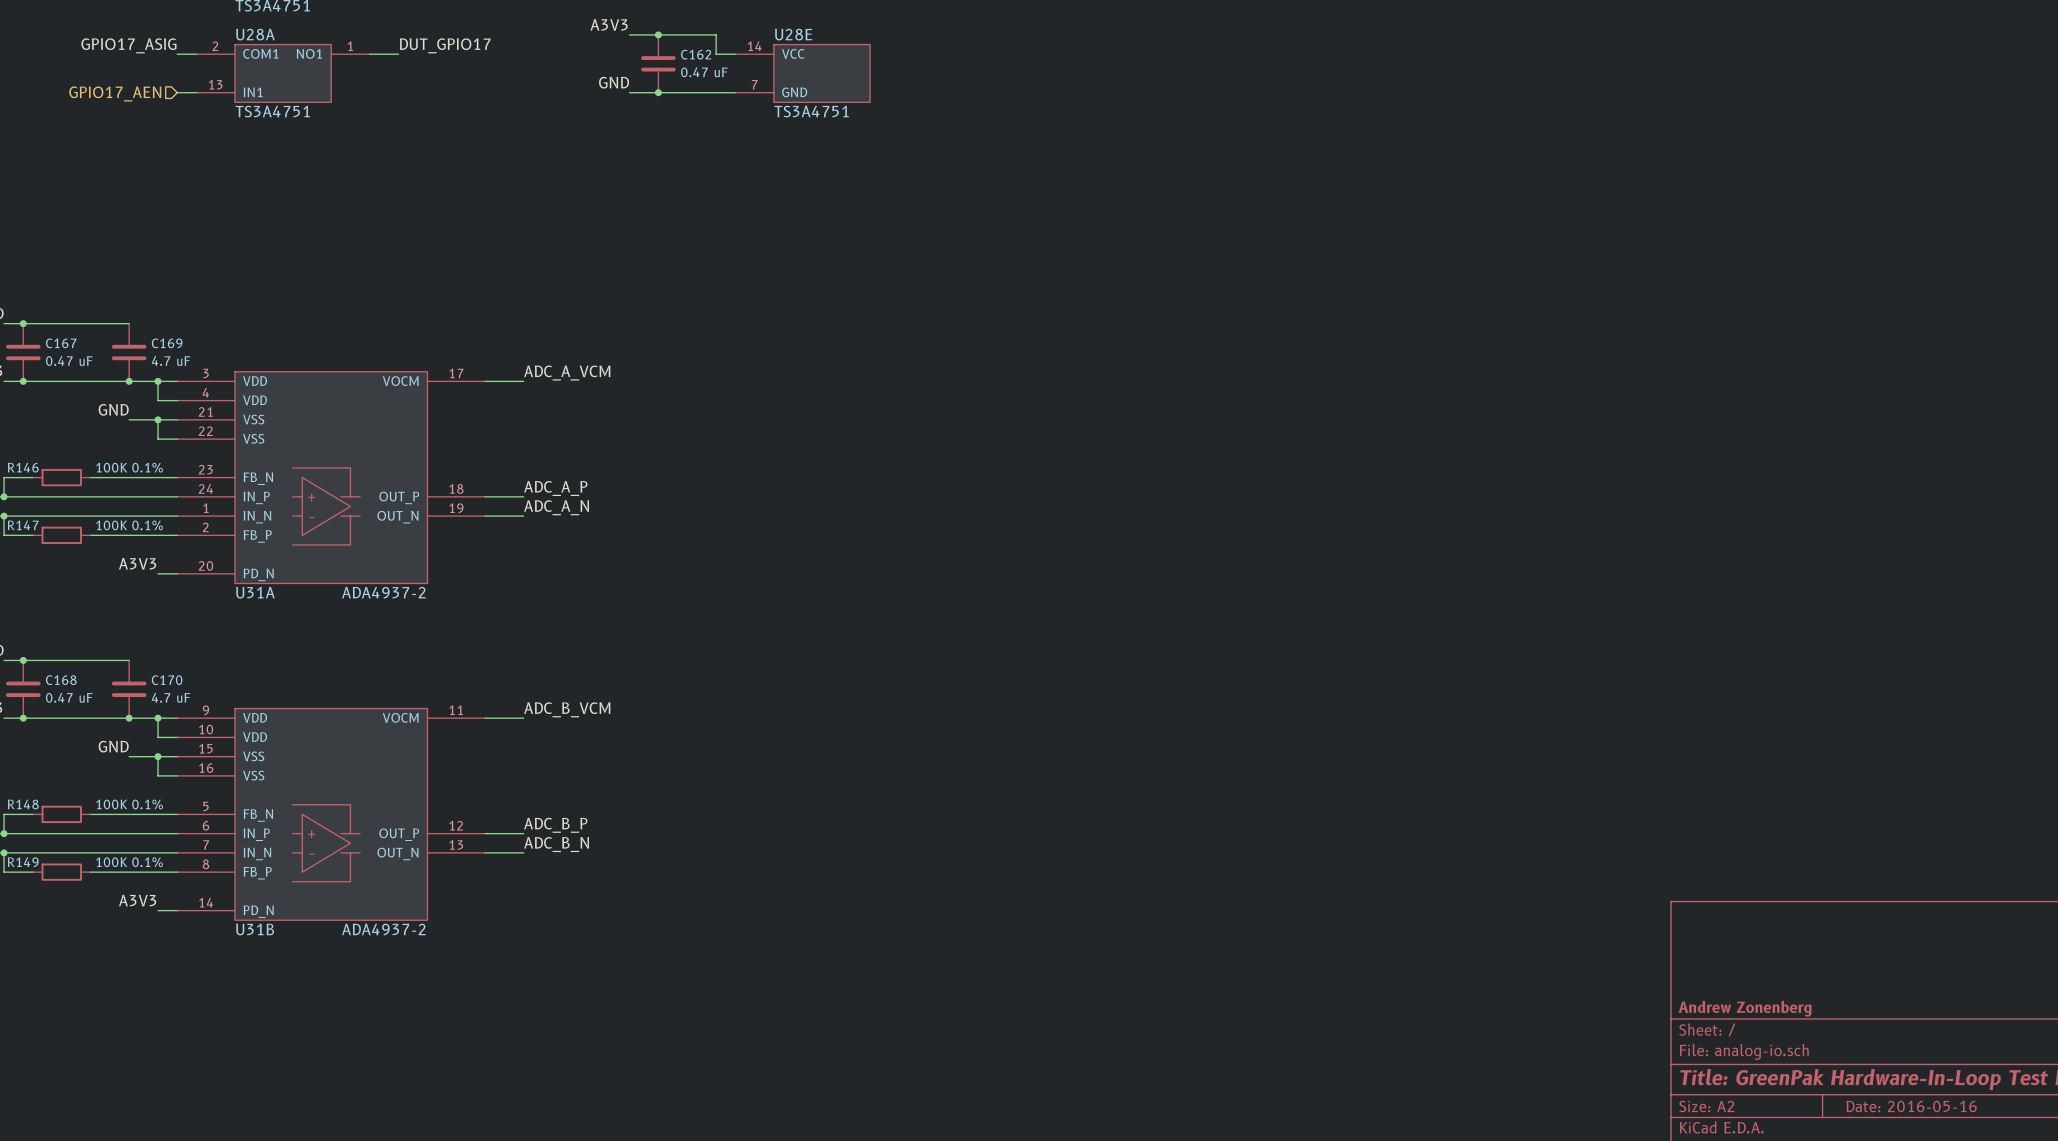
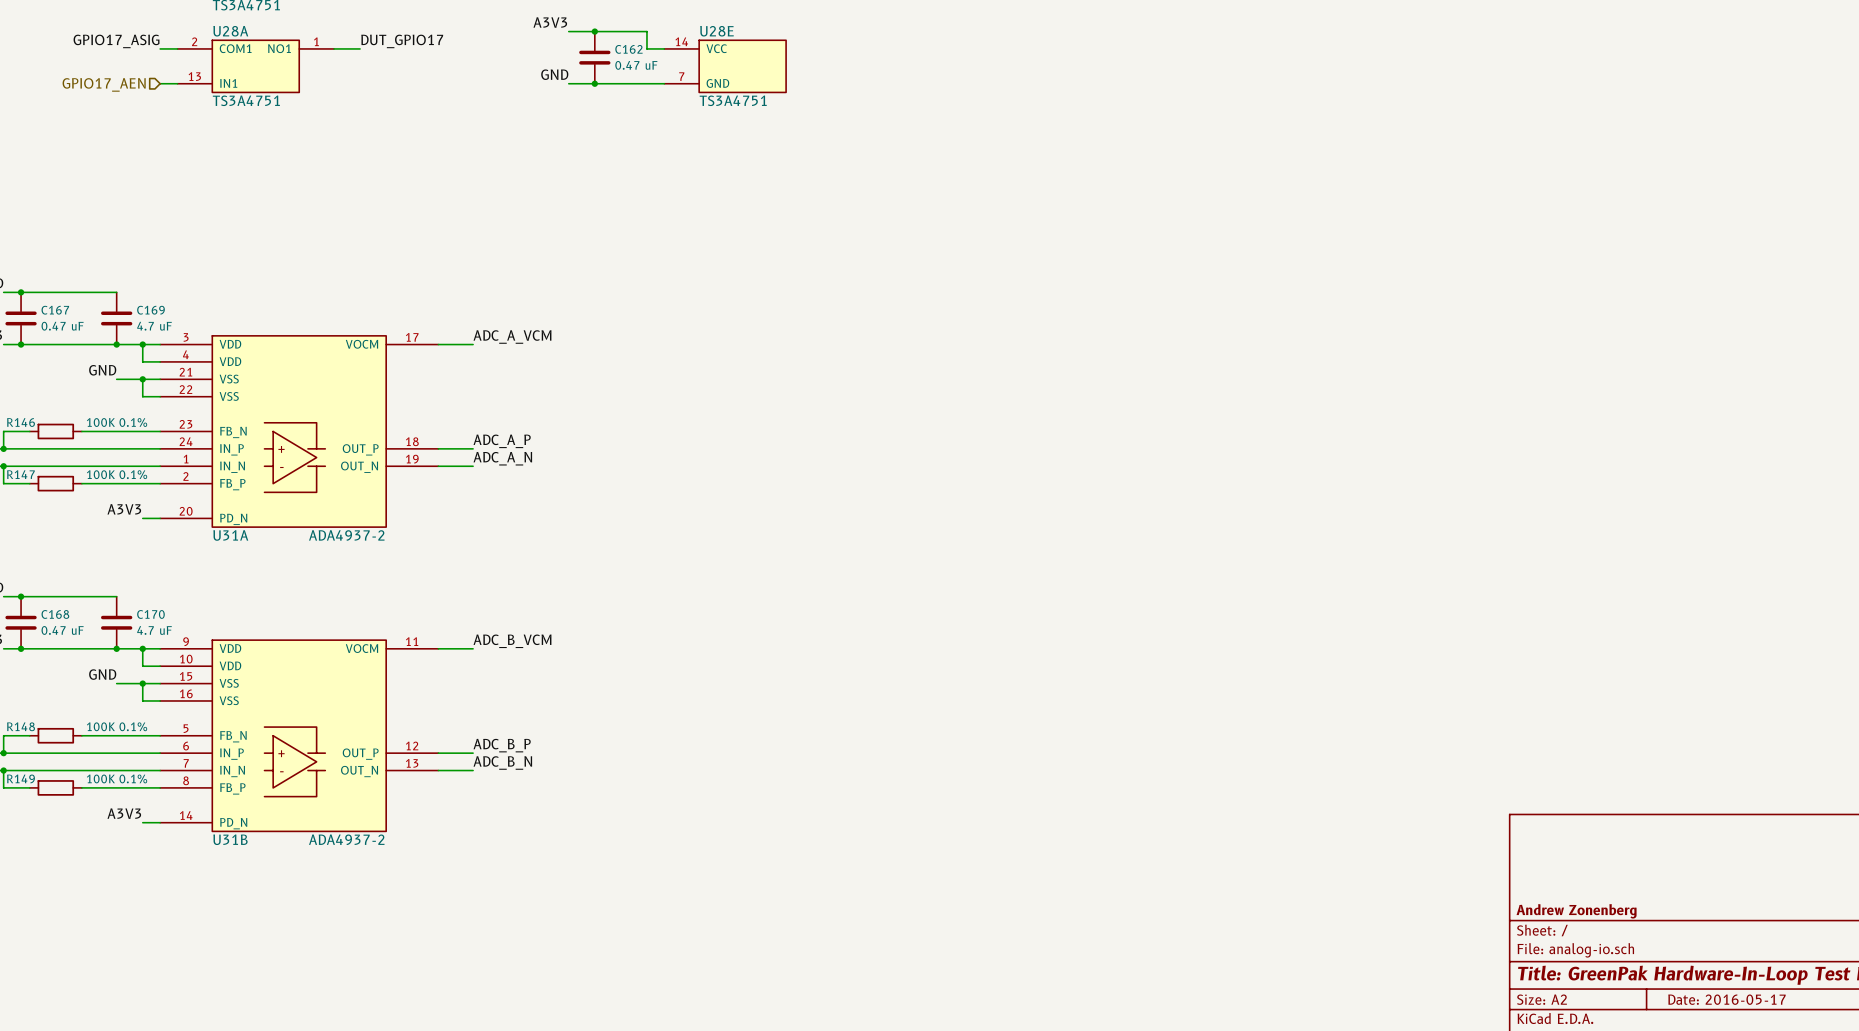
title block: Date: 2016-05-16 (1911, 1106) -> Date: 2016-05-17 (1726, 999)

